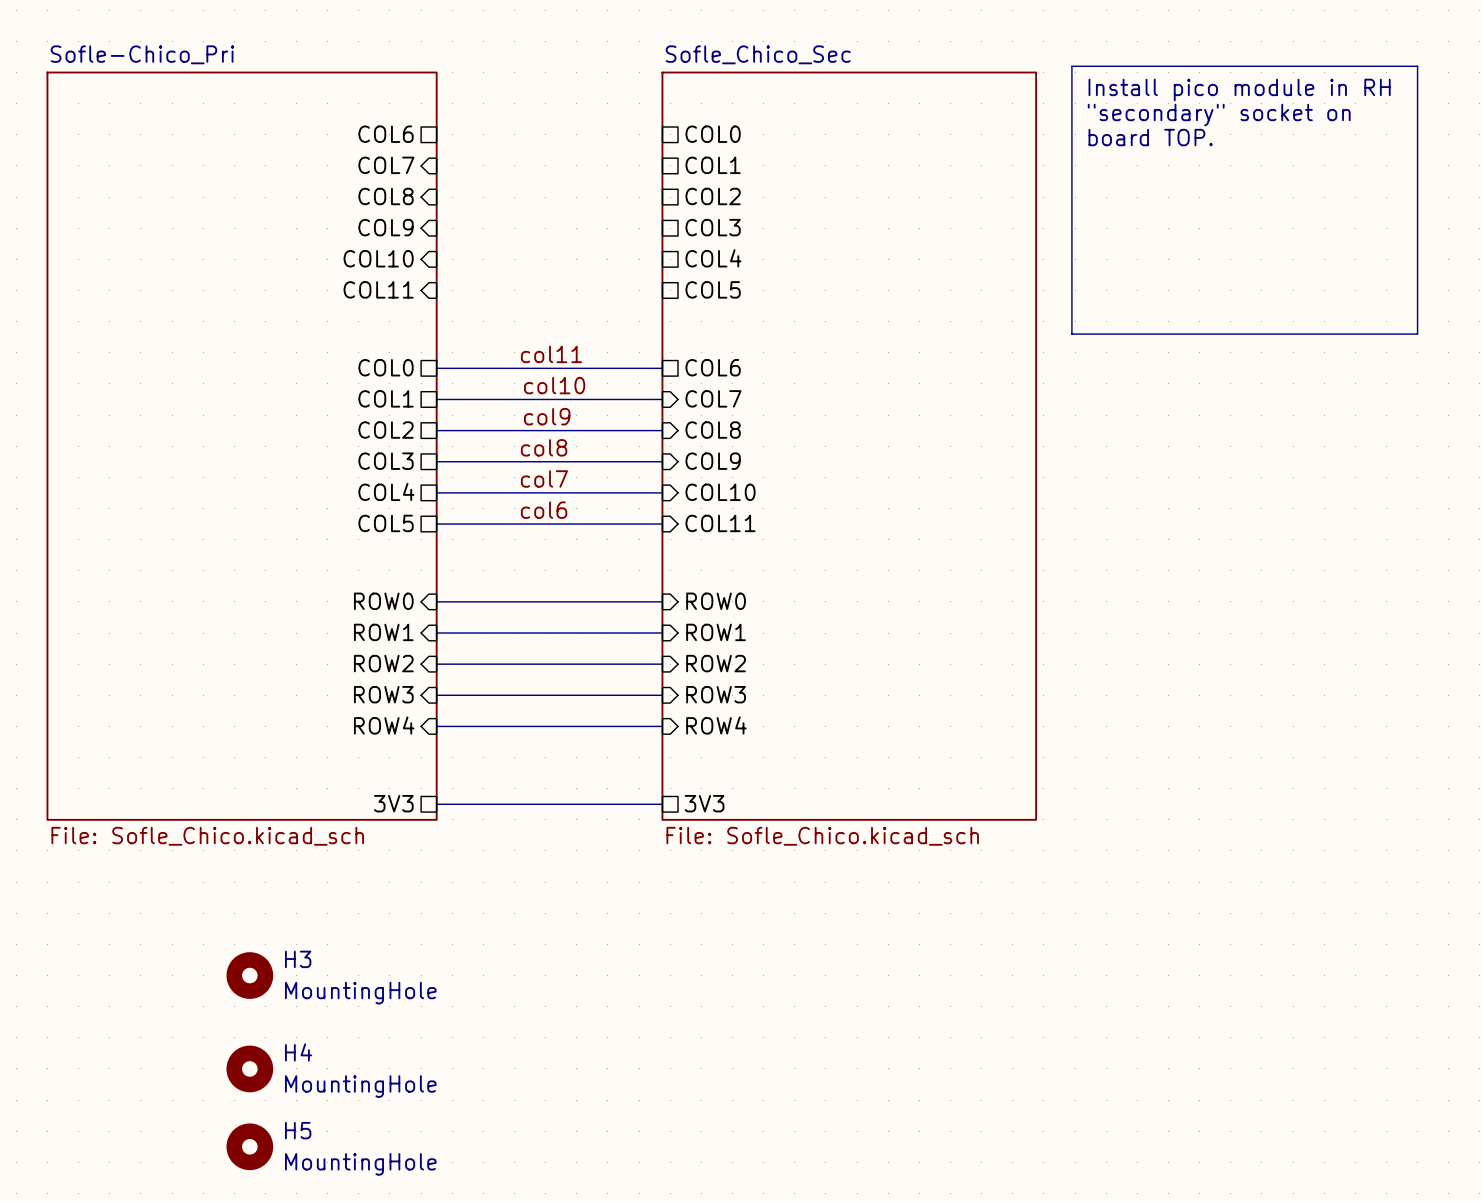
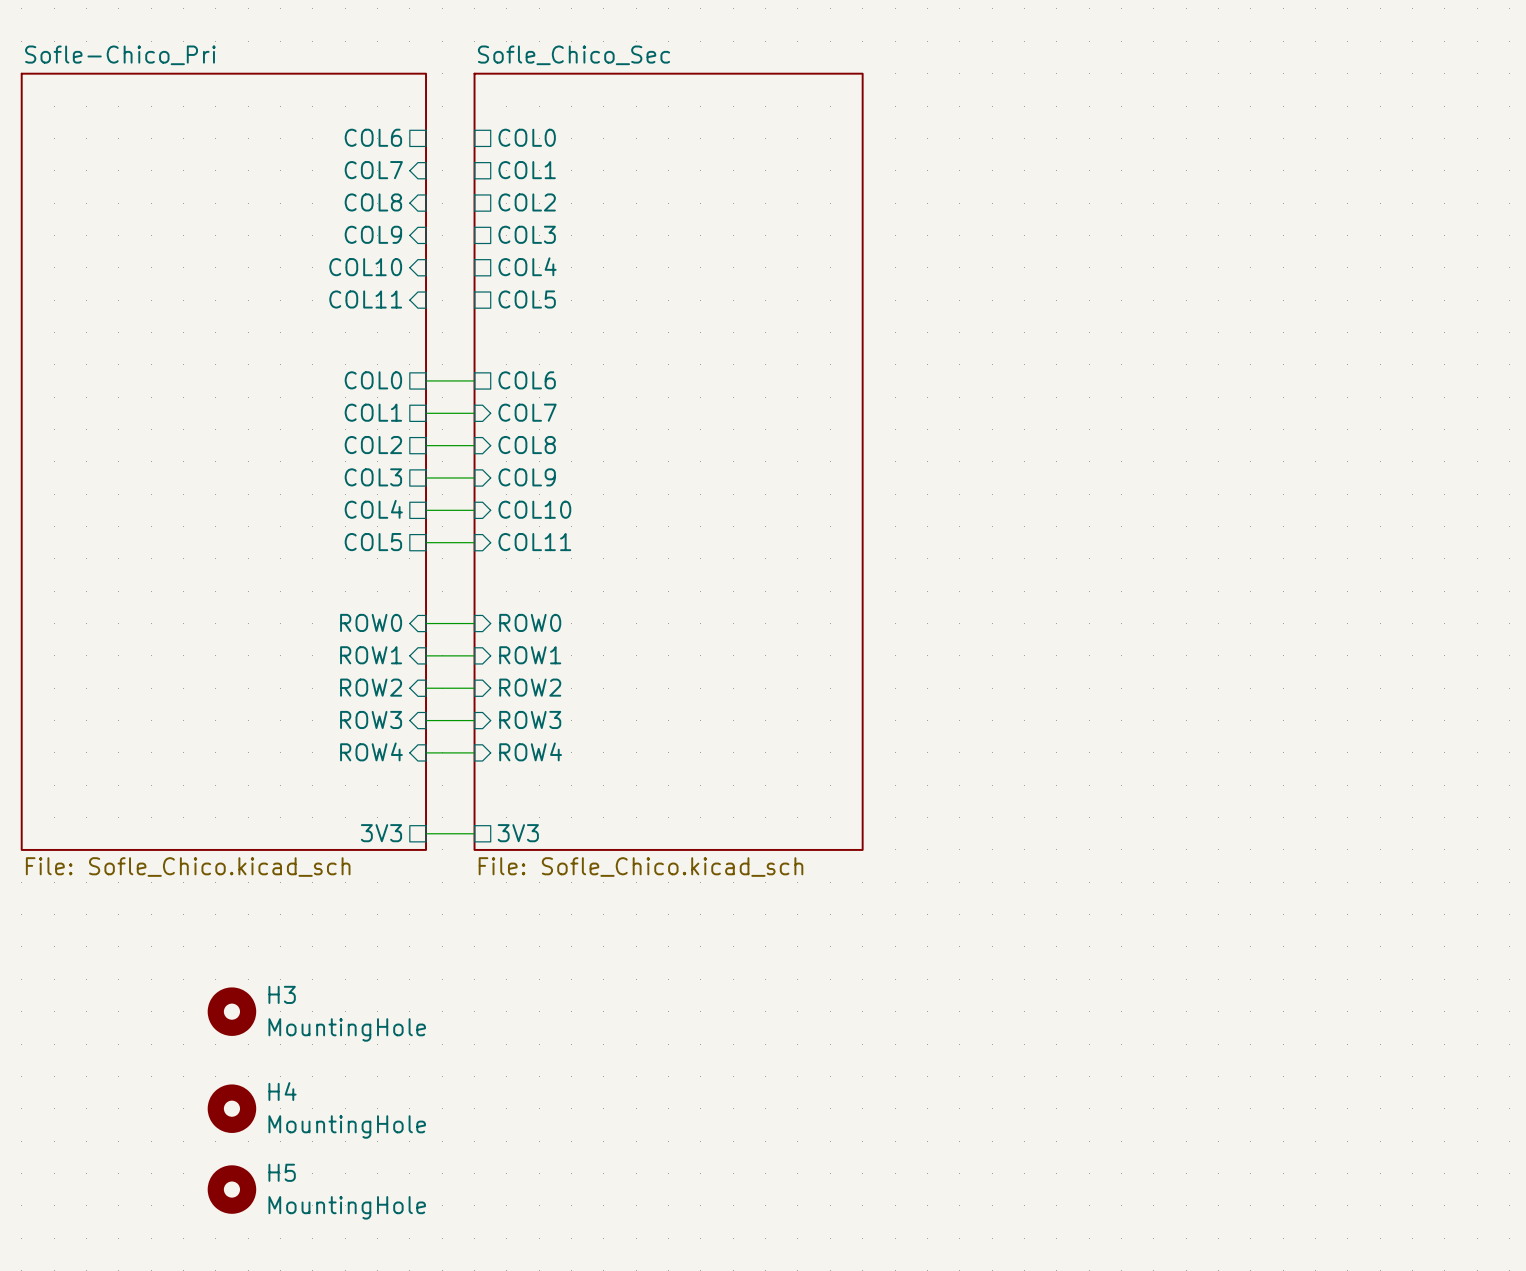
line: (1071, 66) (1417, 66) (1417, 334) (1071, 334) (1071, 66) -> none
text: Install pico module in RH (1239, 90) -> none
text: "secondary" socket on (1219, 115) -> none
sheet pin position: COL0 (713, 134) -> COL0 (527, 137)
text: board TOP. (1150, 137) -> none
sheet pin position: COL1 (713, 165) -> COL1 (527, 170)
sheet pin position: COL2 (713, 196) -> COL2 (527, 202)
sheet pin position: COL3 (713, 227) -> COL3 (527, 234)
sheet pin position: COL4 (713, 258) -> COL4 (527, 266)
sheet pin position: COL5 (713, 289) -> COL5 (527, 299)
label: col11 (551, 354) -> none
sheet pin position: COL6 (713, 367) -> COL6 (527, 380)
wire: (483, 368) (662, 368) -> none
label: col10 (554, 385) -> none
sheet pin position: COL7 (713, 398) -> COL7 (527, 412)
wire: (483, 399) (662, 399) -> none
label: col9 (547, 416) -> none
wire: (483, 430) (662, 430) -> none
sheet pin position: COL8 (713, 430) -> COL8 (527, 445)
sheet Sofle_Chico_Sec position: (849, 446) -> (668, 461)
label: col8 (544, 447) -> none
wire: (483, 461) (662, 461) -> none
sheet pin position: COL9 (713, 461) -> COL9 (527, 477)
label: col7 (544, 478) -> none
wire: (483, 492) (662, 492) -> none
sheet pin position: COL10 (720, 492) -> COL10 (534, 509)
label: col6 (544, 510) -> none
sheet pin position: COL11 (720, 523) -> COL11 (534, 542)
wire: (483, 524) (662, 524) -> none
wire: (483, 601) (662, 601) -> none
sheet pin position: ROW0 (716, 601) -> ROW0 (530, 622)
sheet pin position: ROW1 (716, 632) -> ROW1 (530, 655)
wire: (483, 633) (662, 633) -> none
sheet pin position: ROW2 (716, 663) -> ROW2 (530, 687)
wire: (483, 664) (662, 664) -> none
sheet pin position: ROW3 (716, 694) -> ROW3 (530, 719)
wire: (483, 695) (662, 695) -> none
sheet pin position: ROW4 (716, 725) -> ROW4 (530, 751)
wire: (483, 726) (662, 726) -> none
sheet pin position: 3V3 (704, 803) -> 3V3 (518, 833)
wire: (483, 804) (662, 804) -> none

